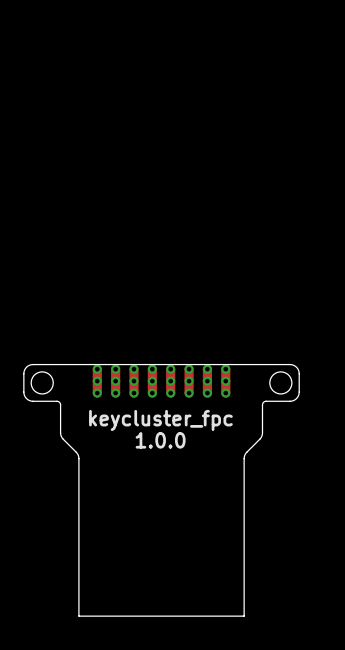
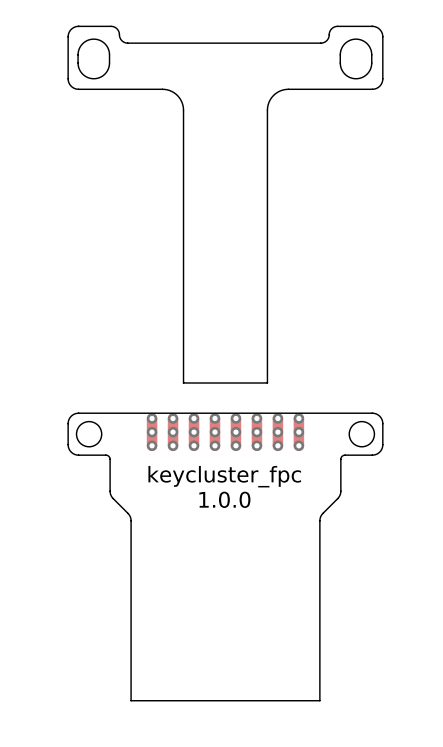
board edge: none -> (78, 26) (113, 26) (118, 30) (121, 39) (127, 43) (321, 43) (327, 39) (330, 30) (335, 26) (372, 26)
board edge: none -> (79, 26) (72, 28) (68, 35) (68, 79) (72, 87) (78, 89) (164, 89) (175, 93) (182, 103) (183, 382) (267, 382) (268, 104) (273, 95) (285, 89) (372, 89) (378, 87) (382, 79) (382, 35) (378, 28) (371, 26)
board edge: none -> (78, 54) (78, 63) (78, 65) (79, 69) (85, 76) (97, 78) (107, 70) (109, 52) (107, 46) (101, 41) (93, 39) (85, 41) (80, 46) (78, 50) (78, 52) (78, 54)
board edge: none -> (340, 54) (341, 69) (348, 76) (360, 78) (369, 70) (371, 52) (369, 46) (363, 41) (356, 39) (348, 41) (342, 46) (340, 54)

